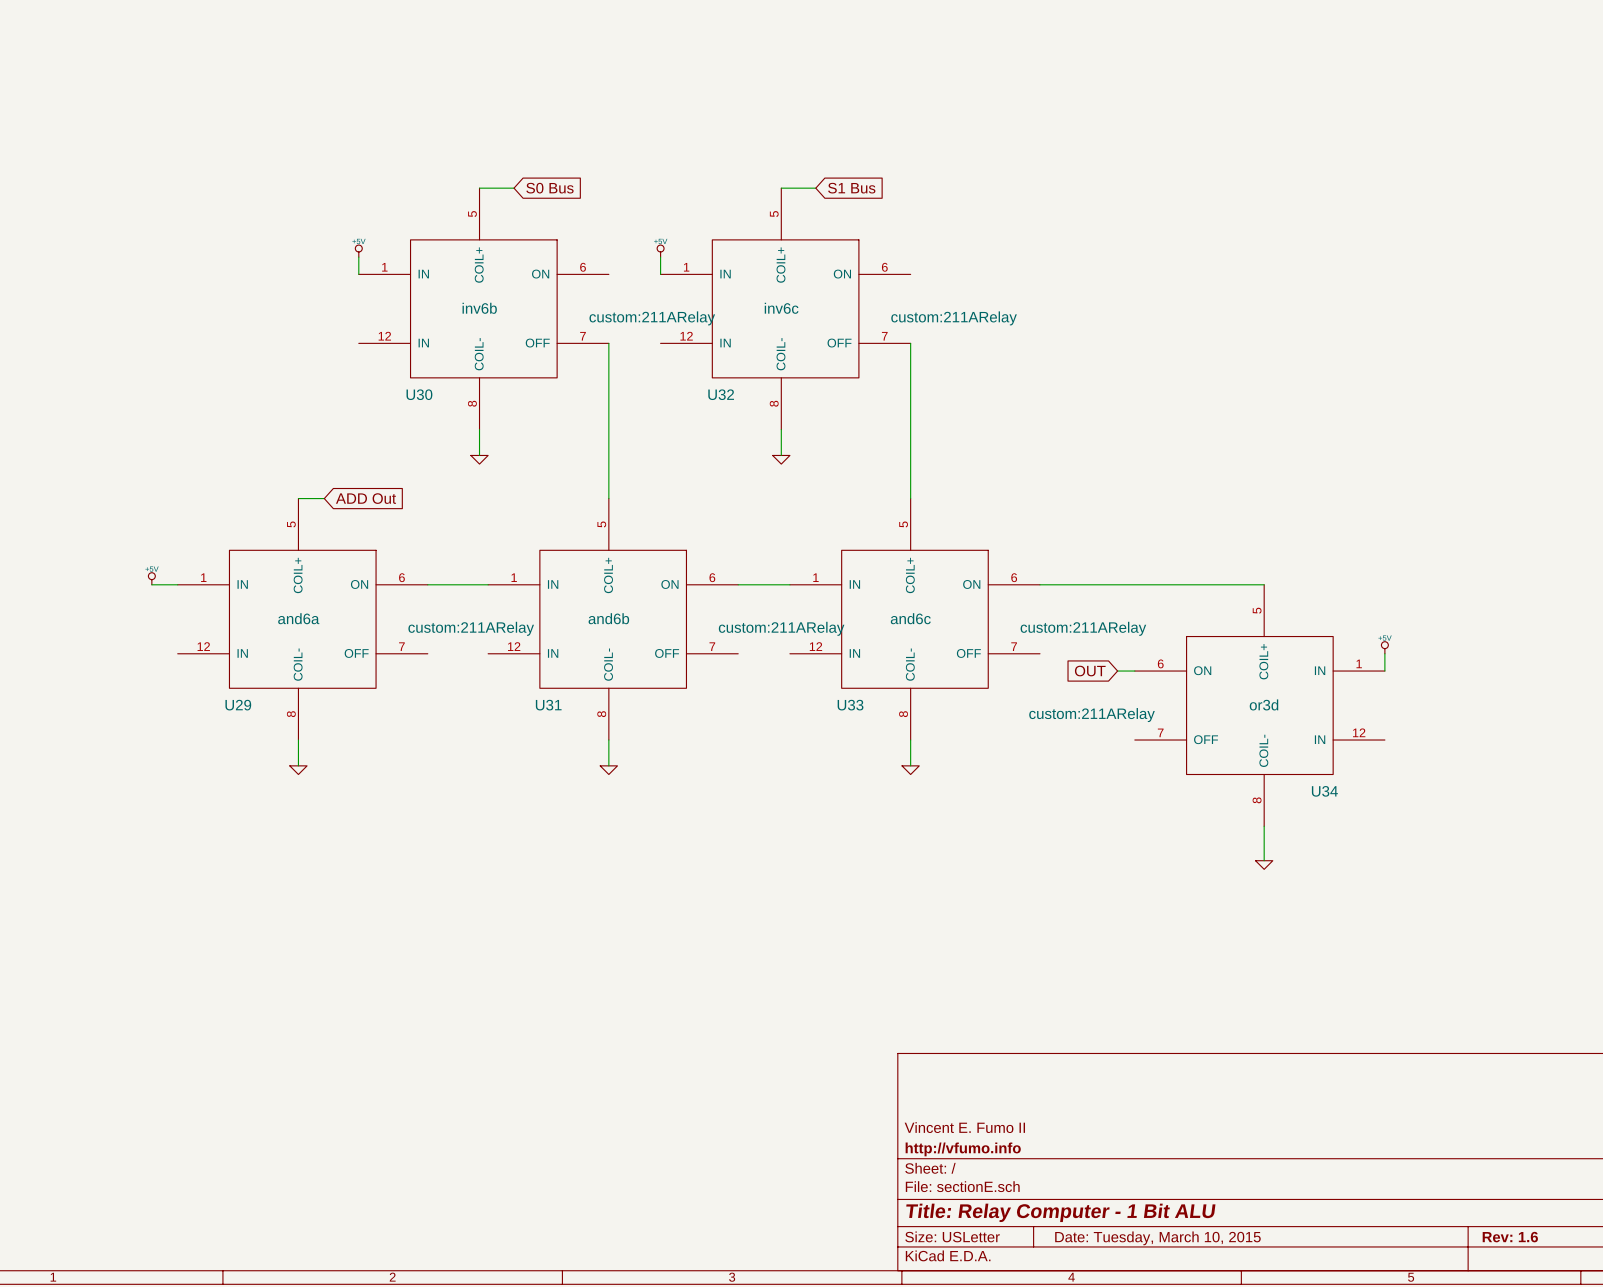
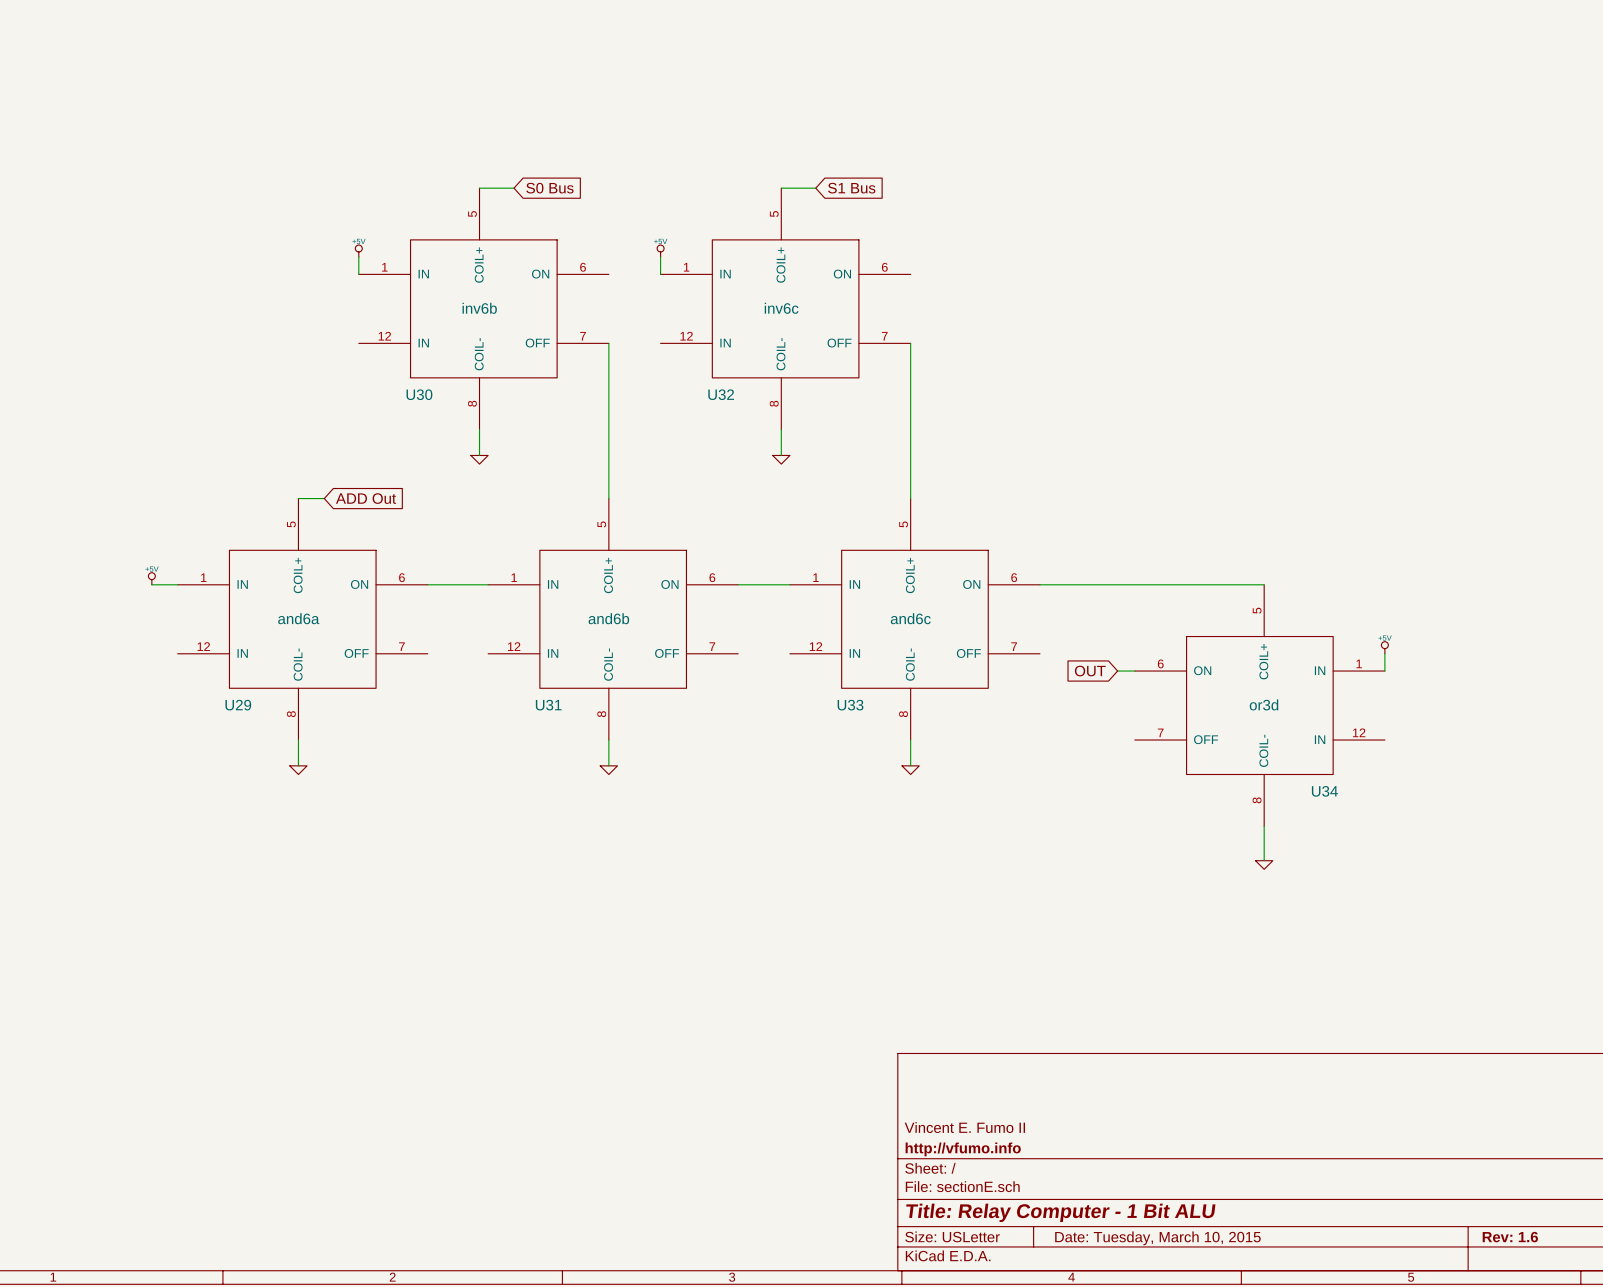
U30 text: custom:211ARelay (652, 318) -> none
U32 text: custom:211ARelay (954, 318) -> none
U29 text: custom:211ARelay (471, 628) -> none
U31 text: custom:211ARelay (781, 628) -> none
U33 text: custom:211ARelay (1083, 628) -> none
U34 text: custom:211ARelay (1092, 715) -> none

